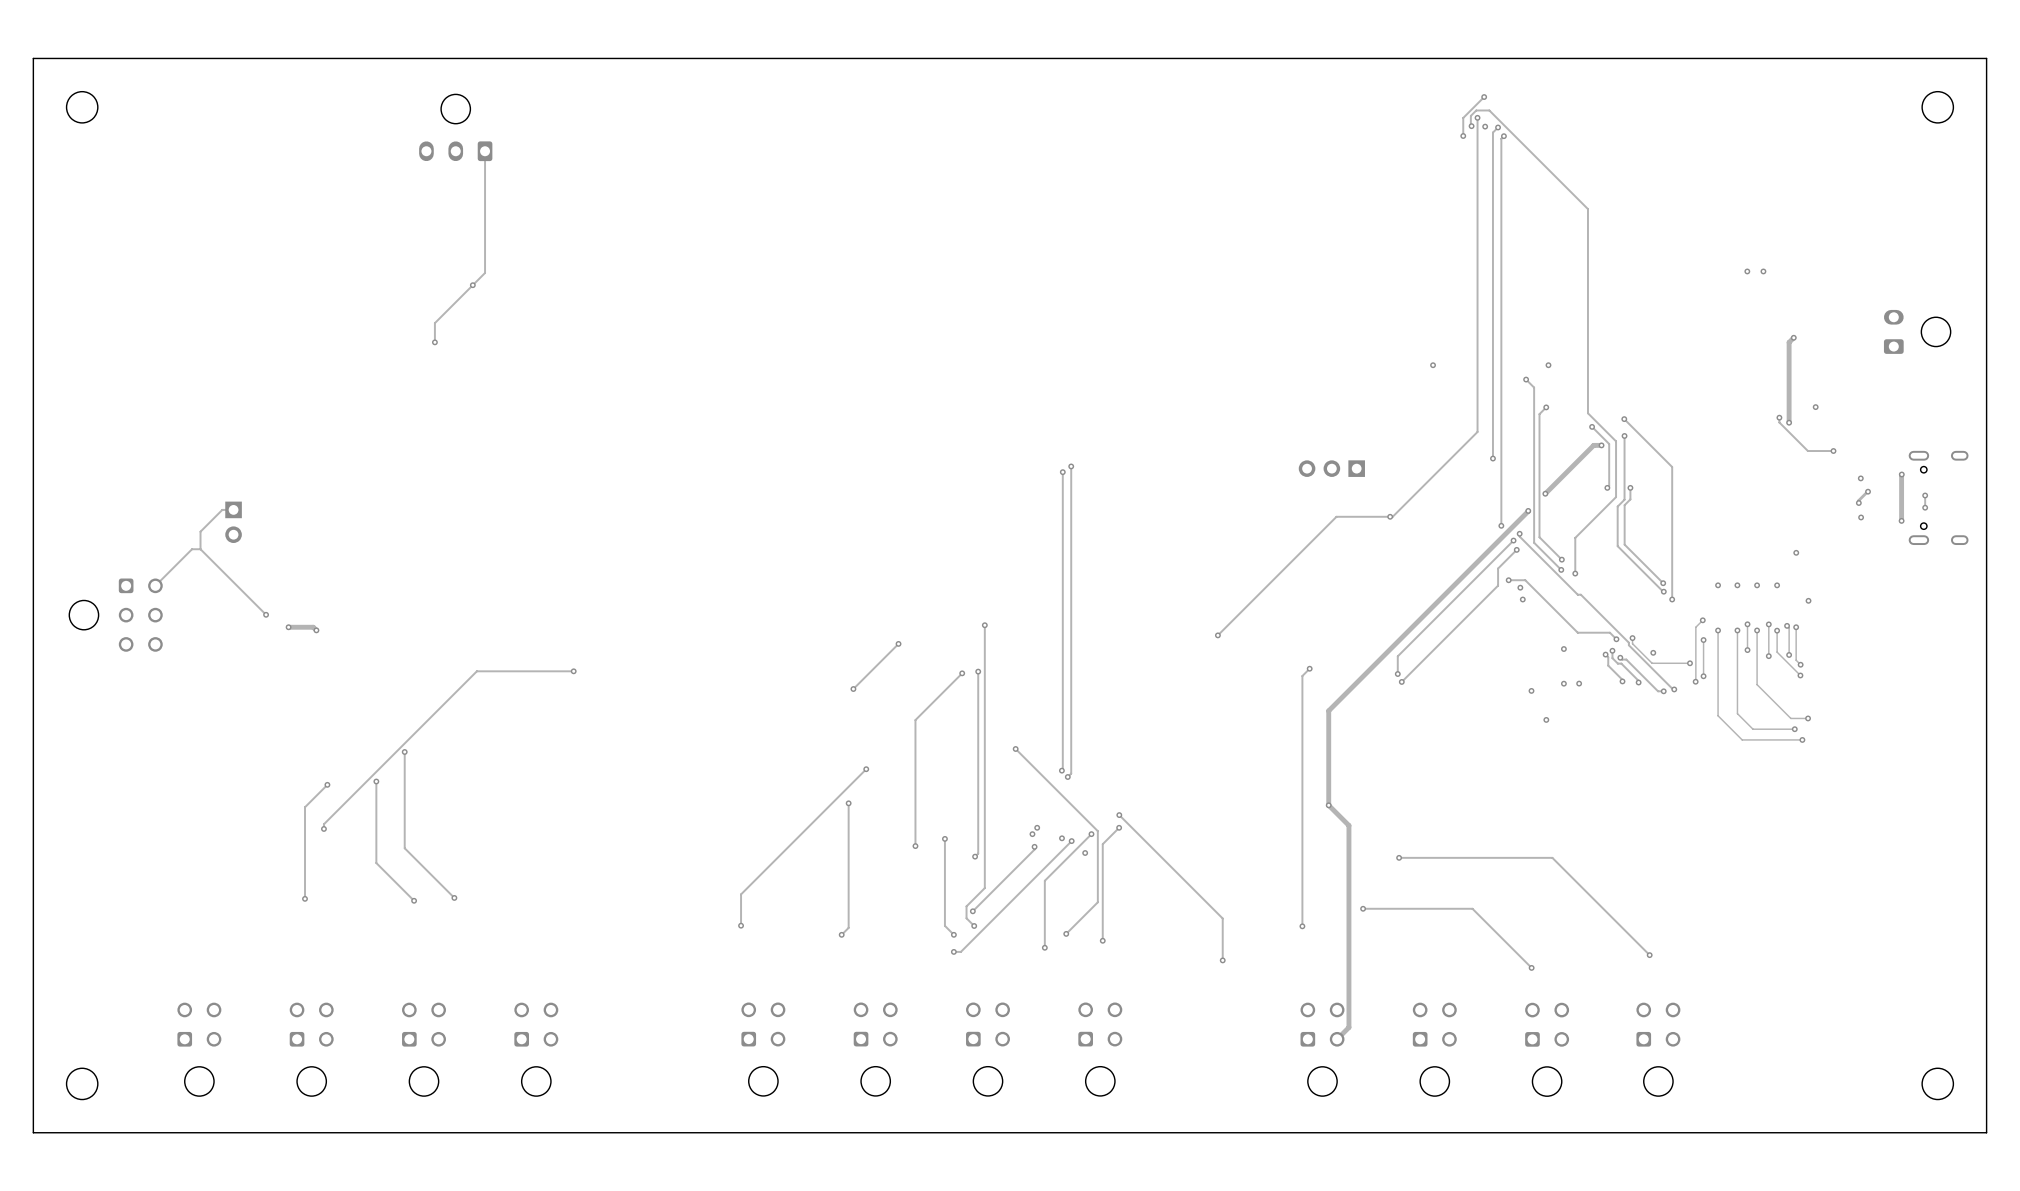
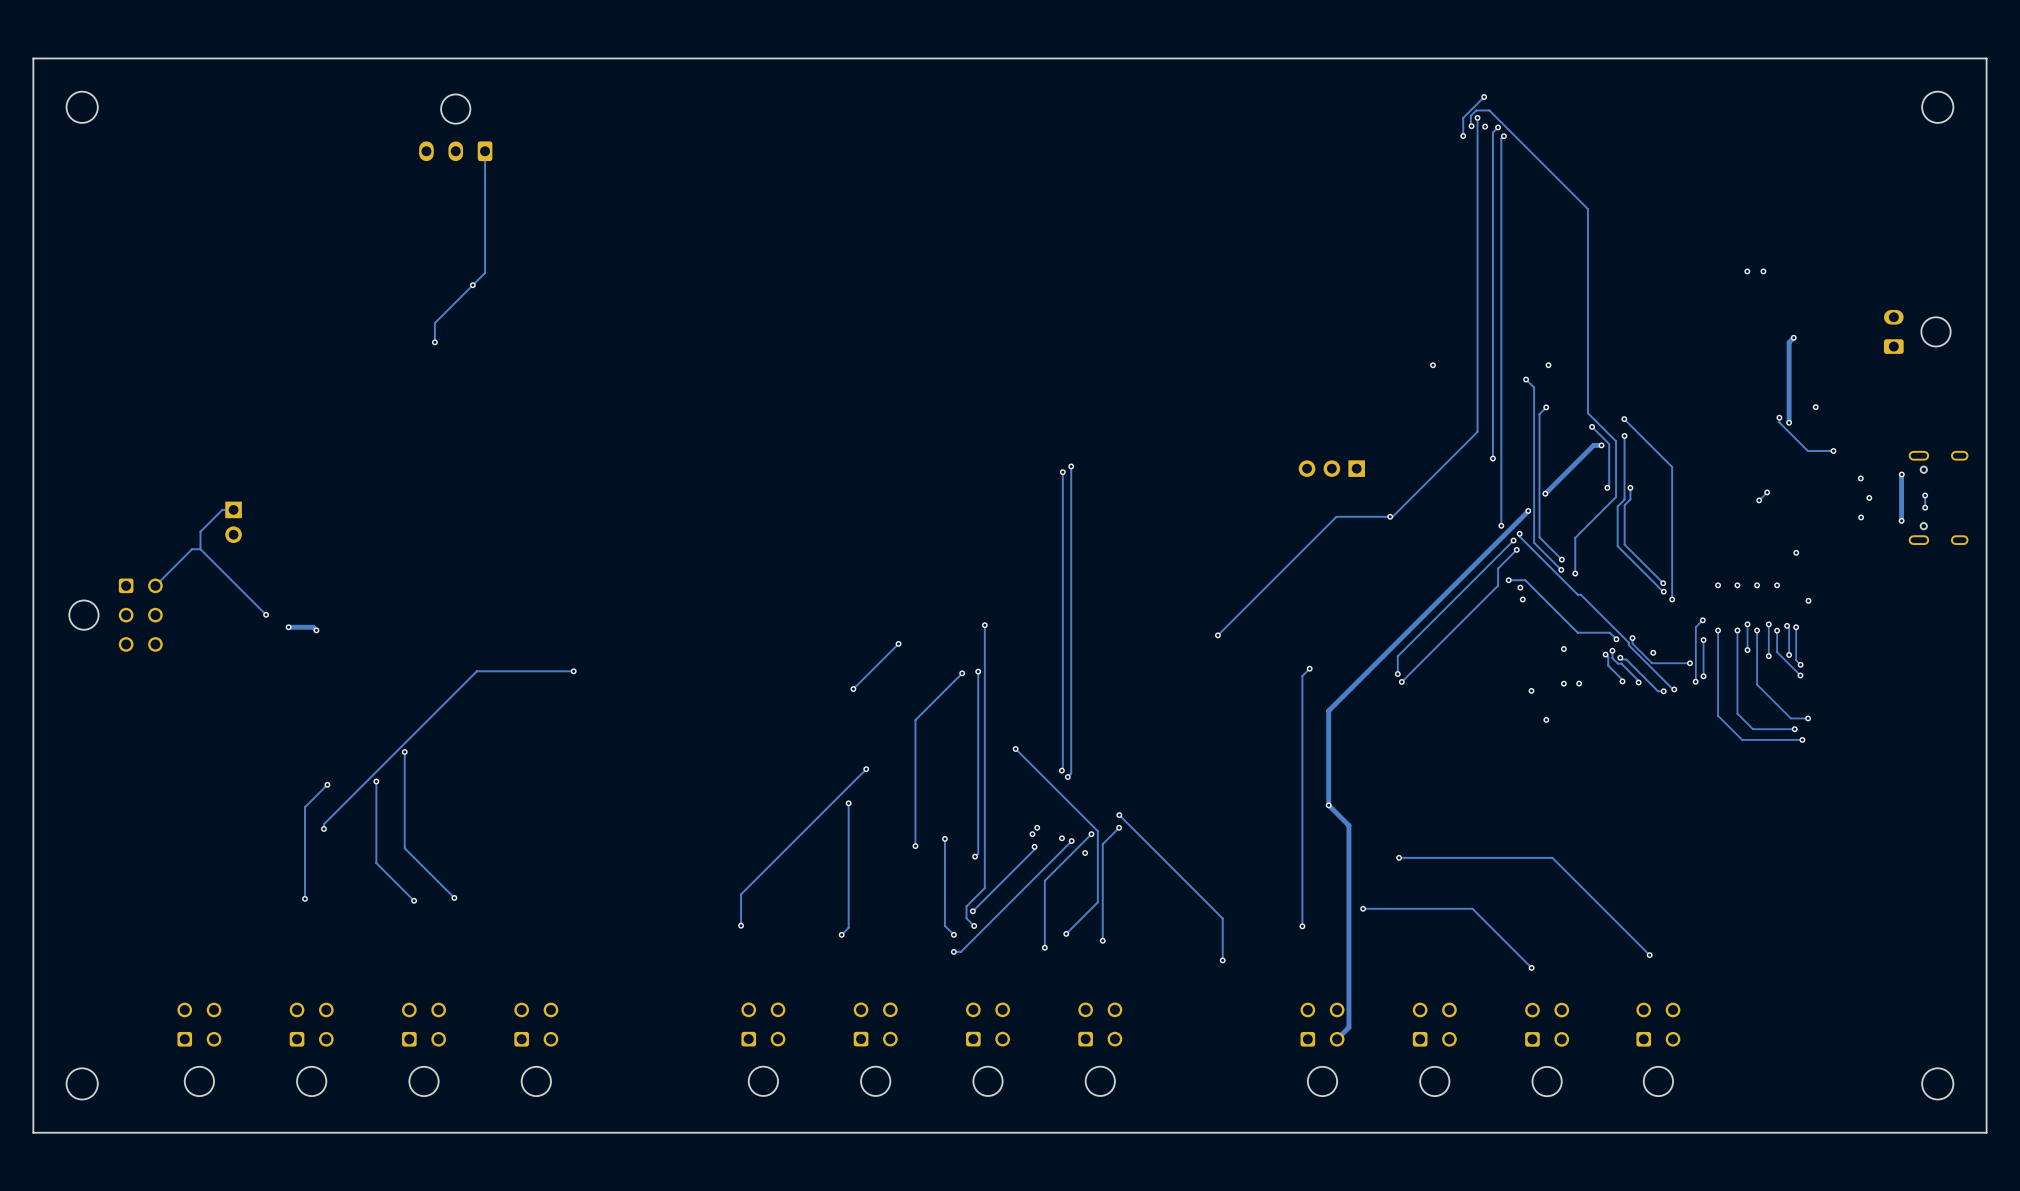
track: (1868, 491) (1858, 500) (1858, 503) -> none
via: (1868, 491) -> none
track: none -> (1767, 492) (1759, 500)
via: none -> (1767, 492)
via: none -> (1869, 497)
via: none -> (1759, 500)
via: (1858, 503) -> none

